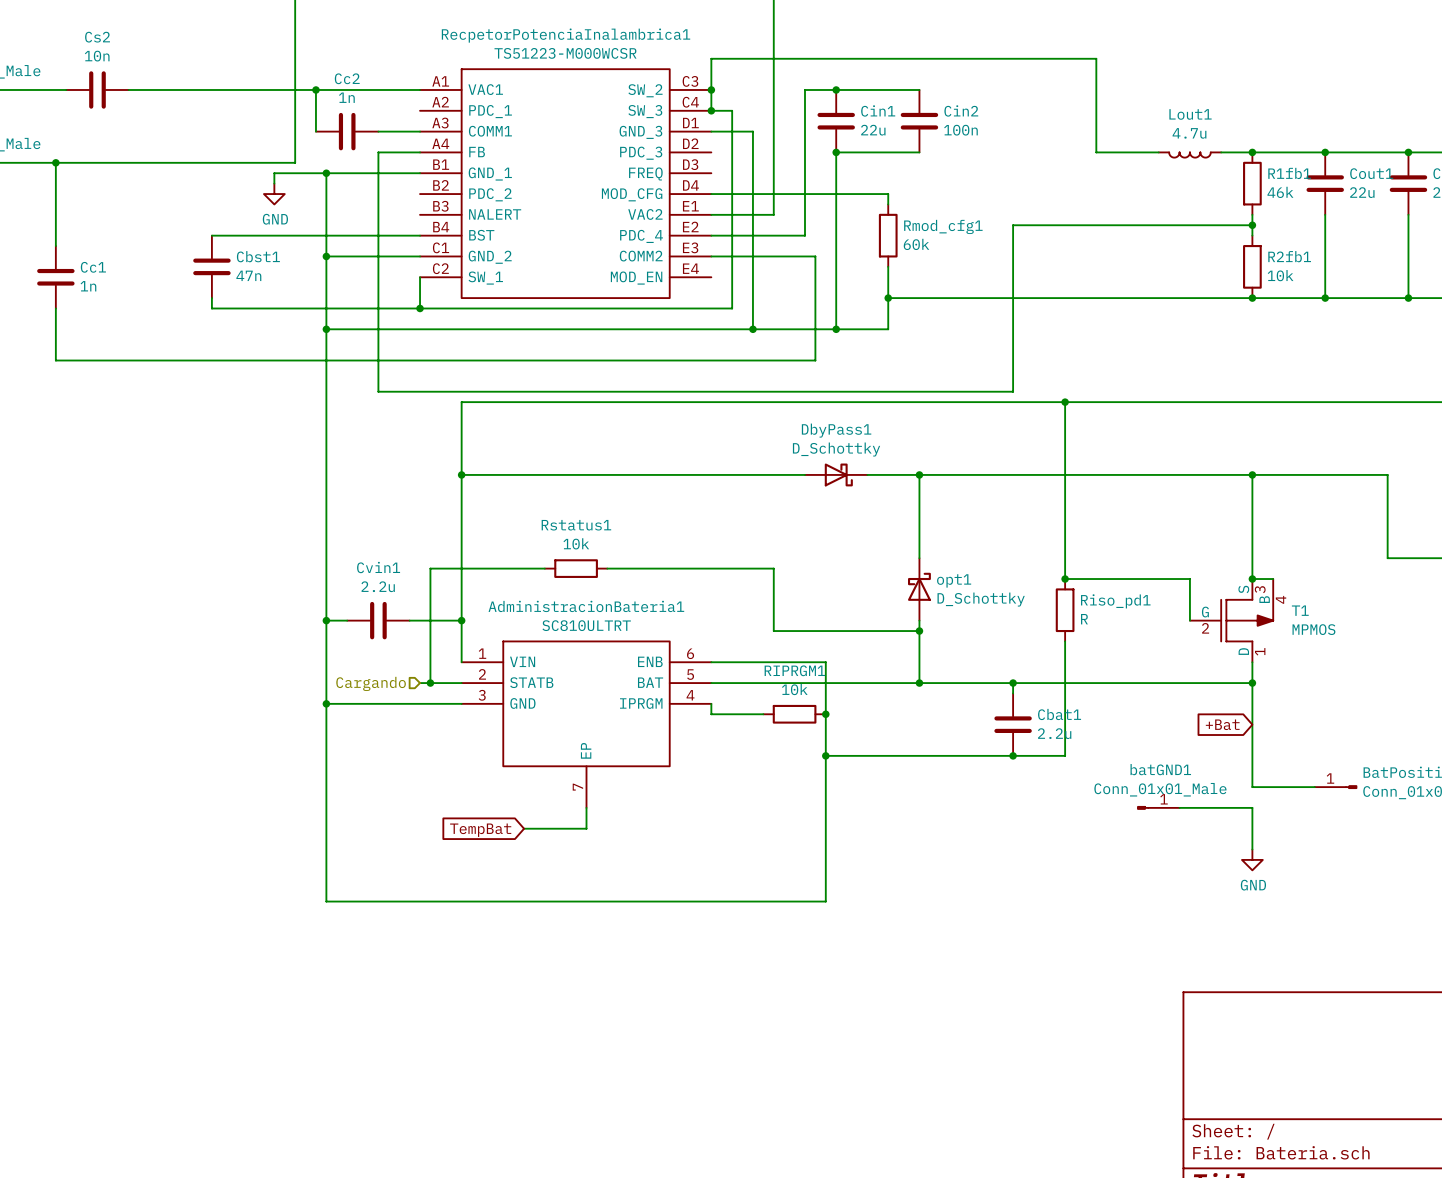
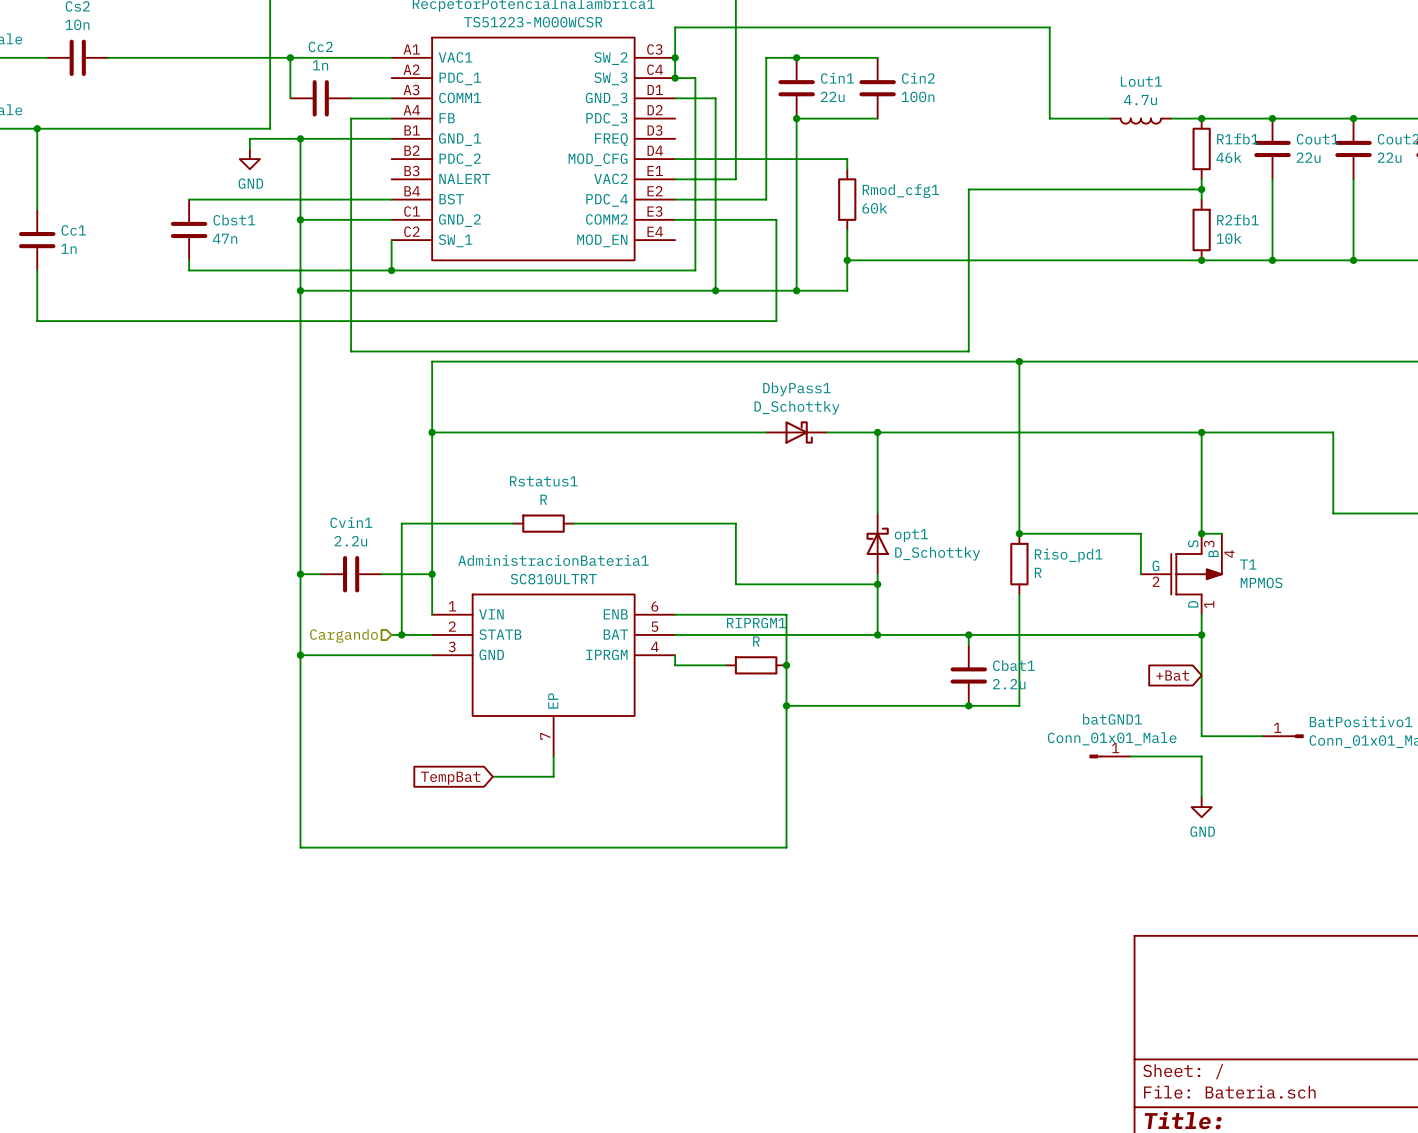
Rstatus1 value: 10k (576, 543) -> R (543, 499)
RIPRGM1 value: 10k (794, 689) -> R (756, 641)

